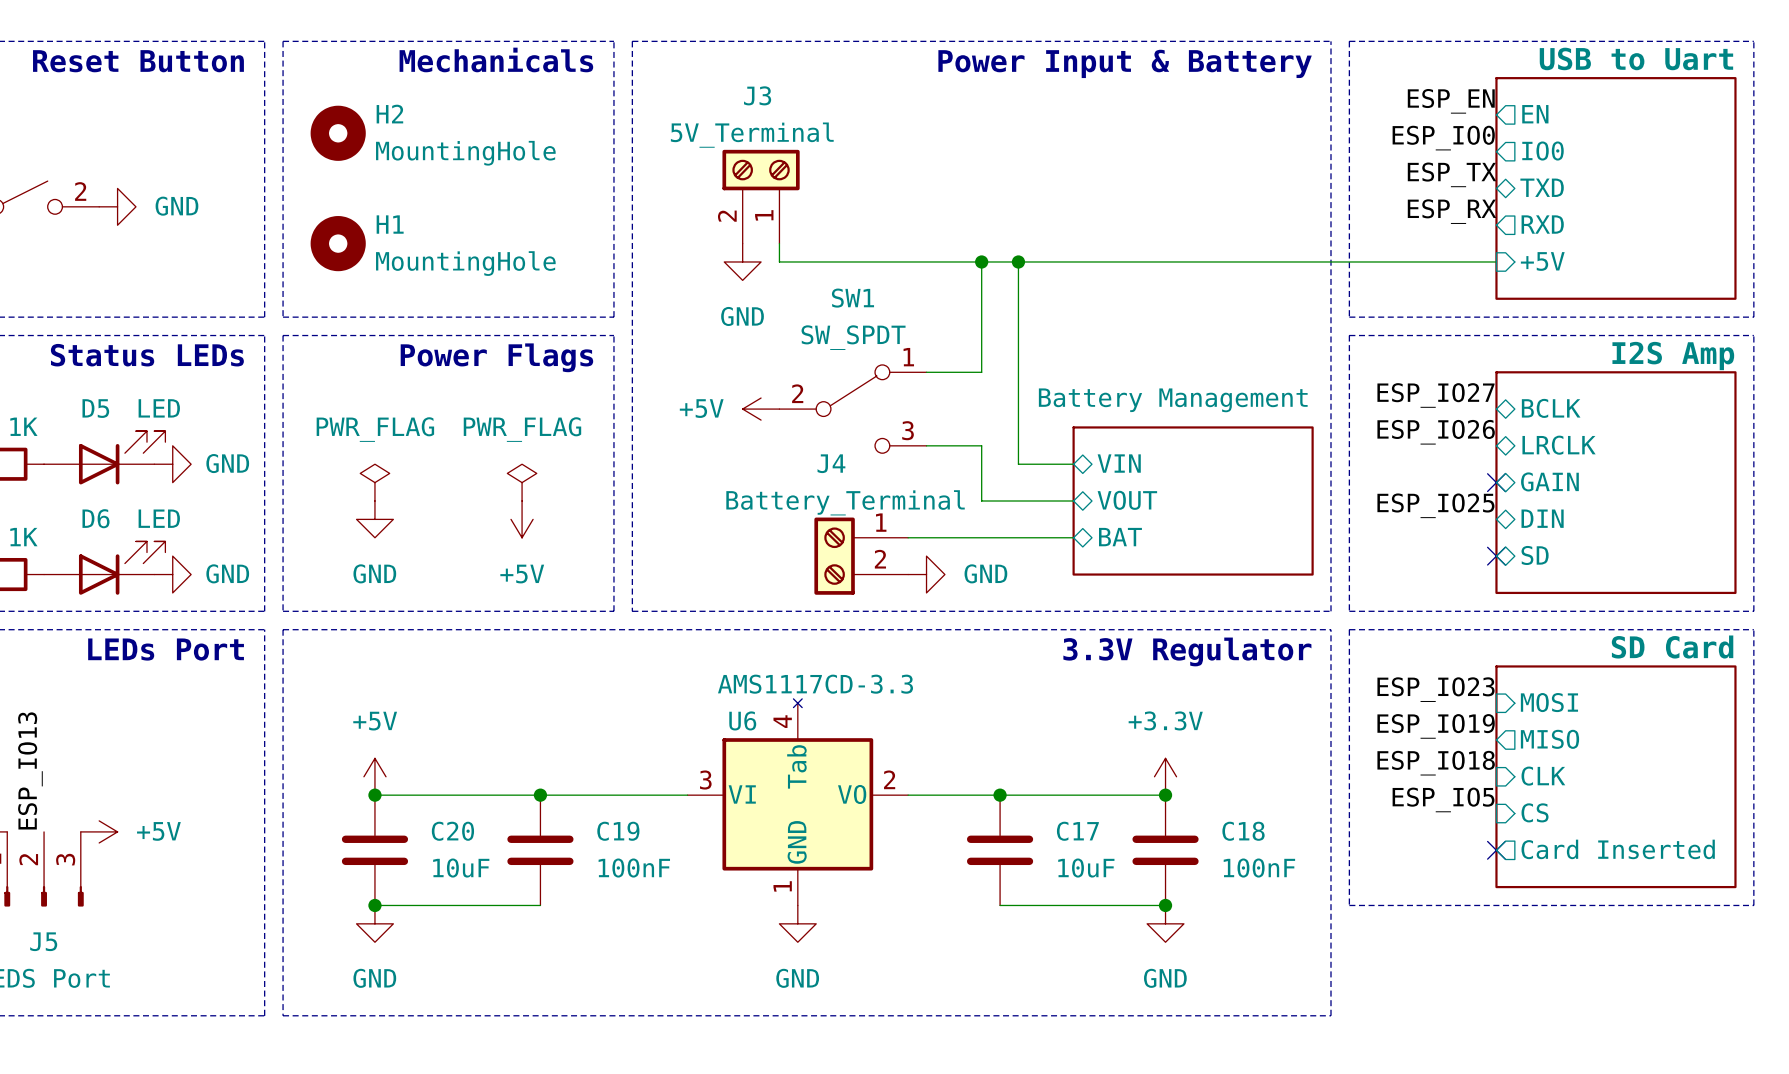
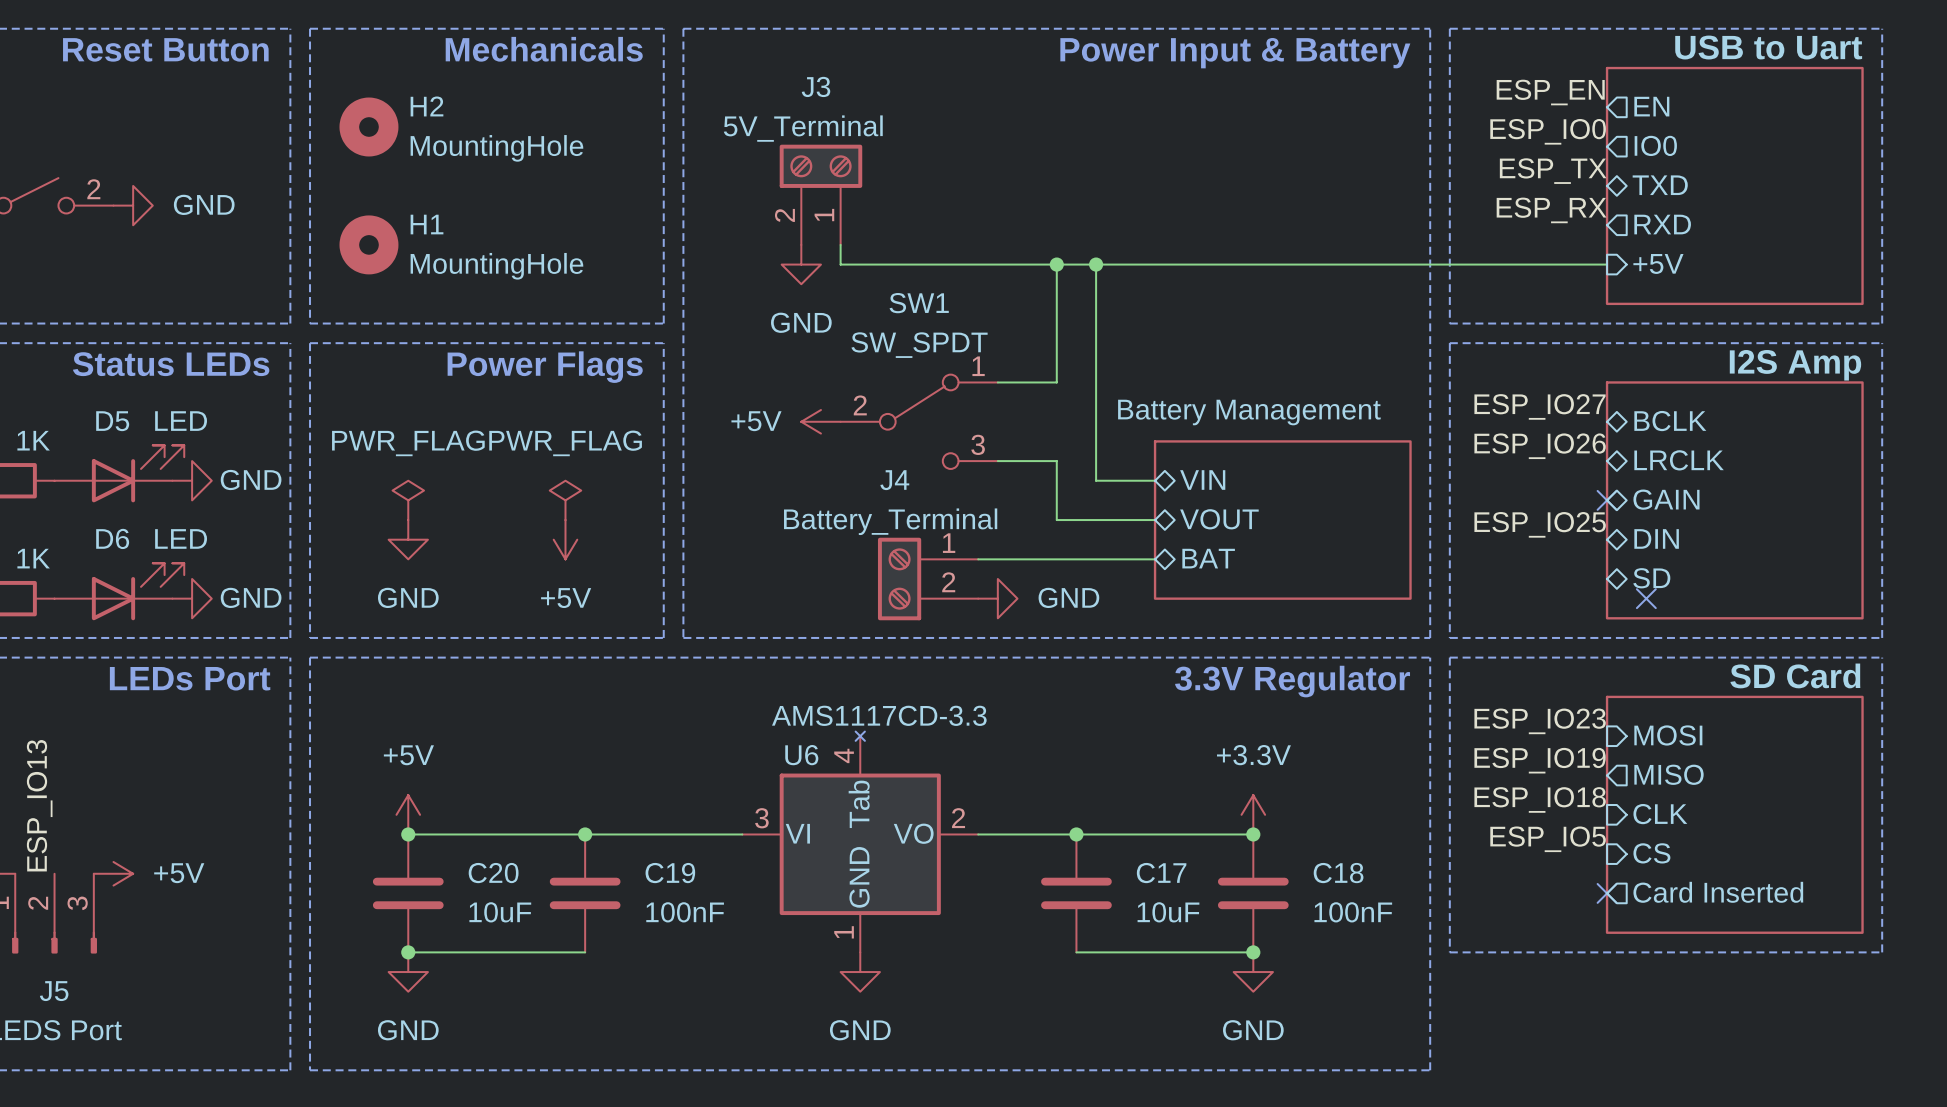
no-connect mark position: (1496, 556) -> (1646, 598)

